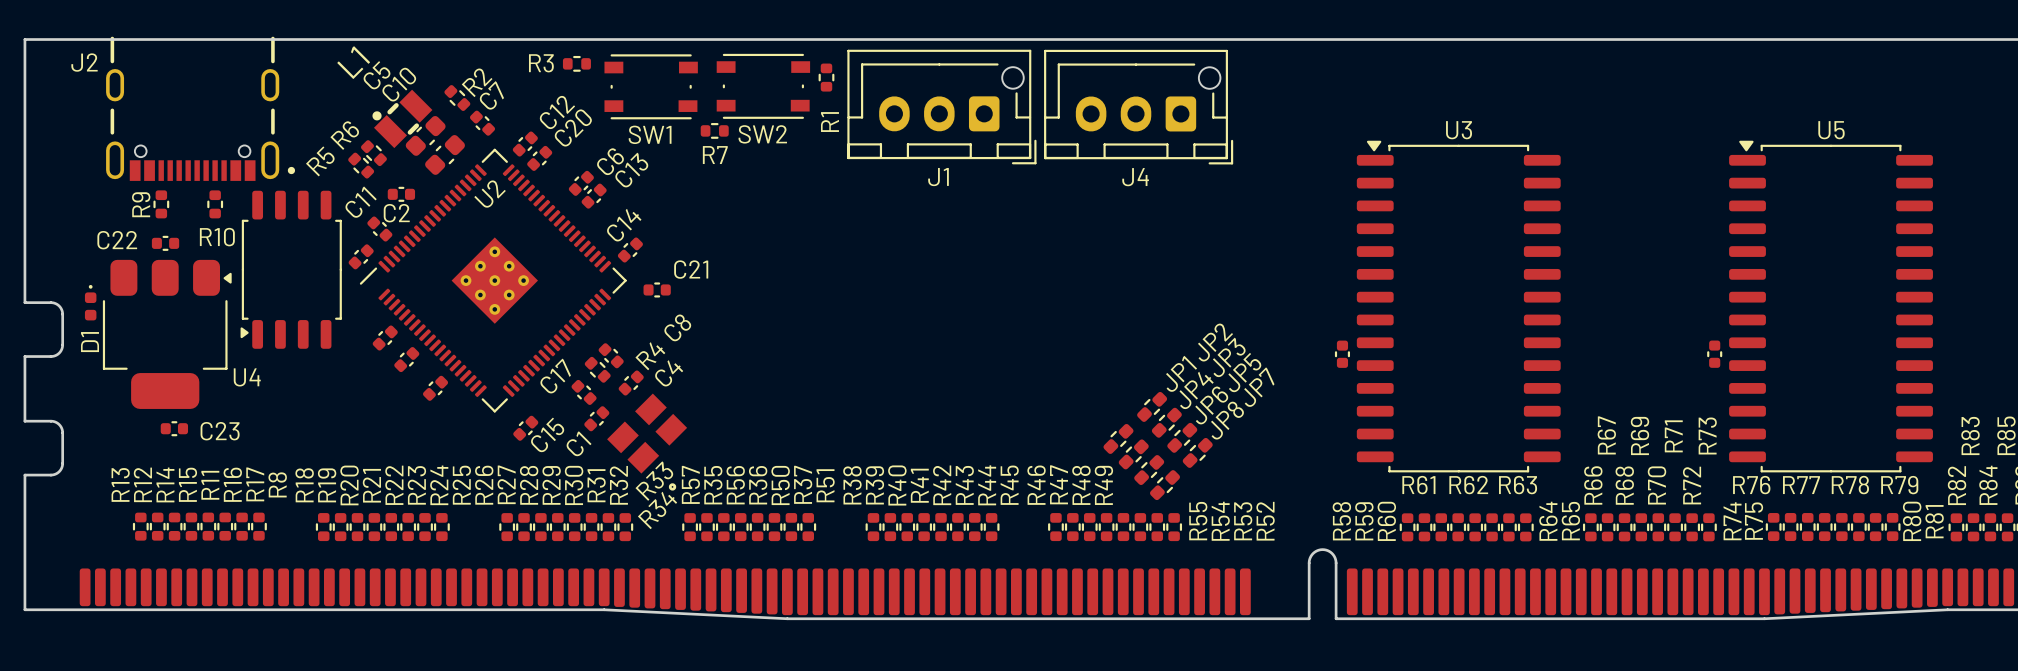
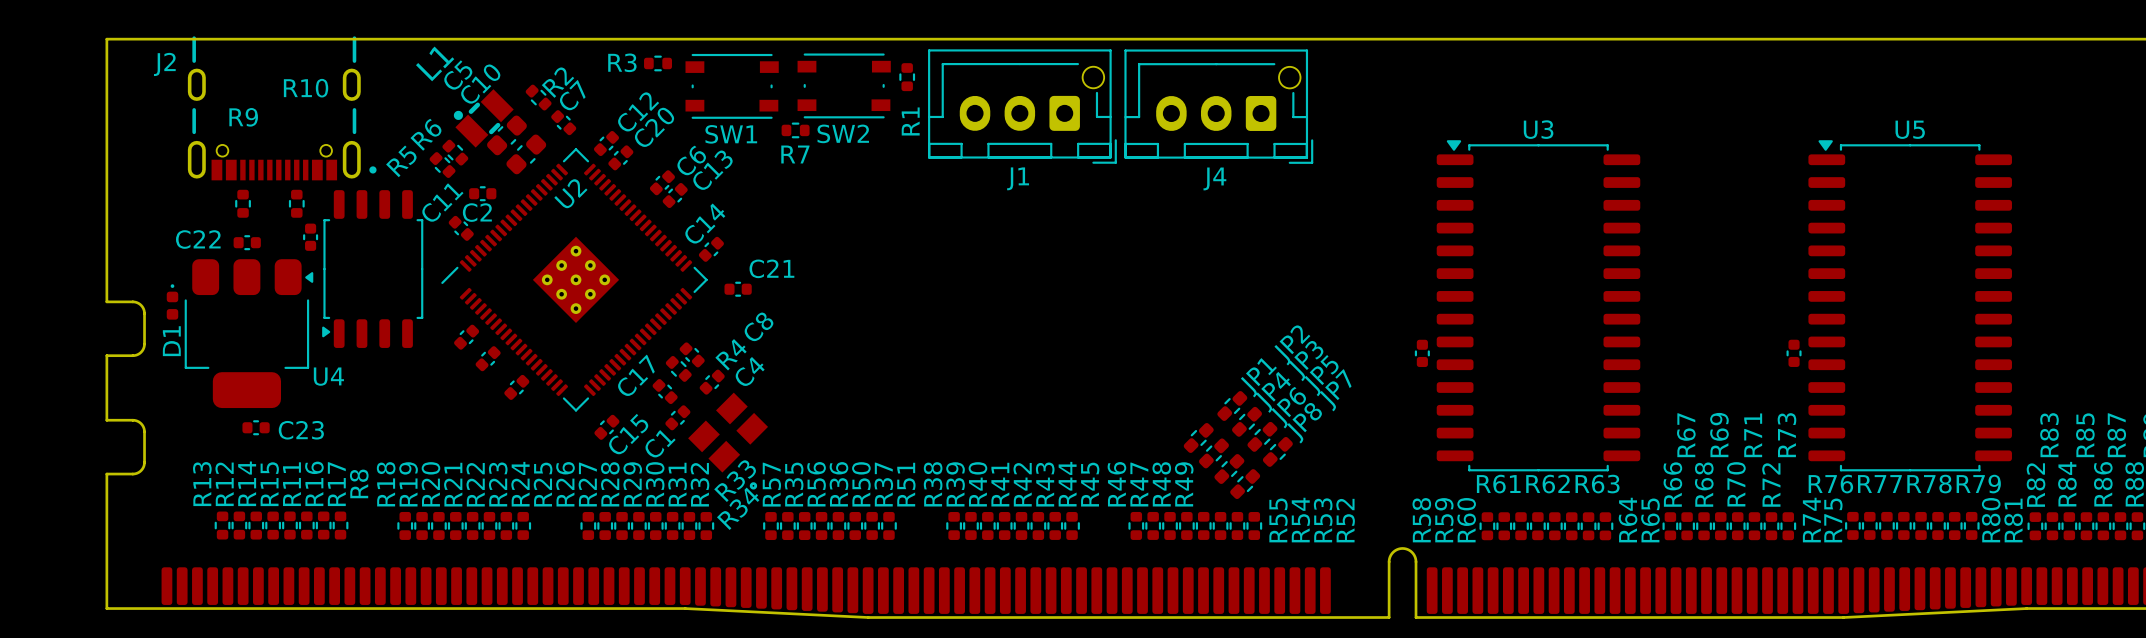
R9 name rotation: 0° (141, 204) -> 90° clockwise (243, 117)
R9 name position: R9 (141, 204) -> R9 (243, 117)
R10 name position: R10 (217, 237) -> R10 (306, 88)
part: none -> (310, 237)
part: (361, 256) -> none

